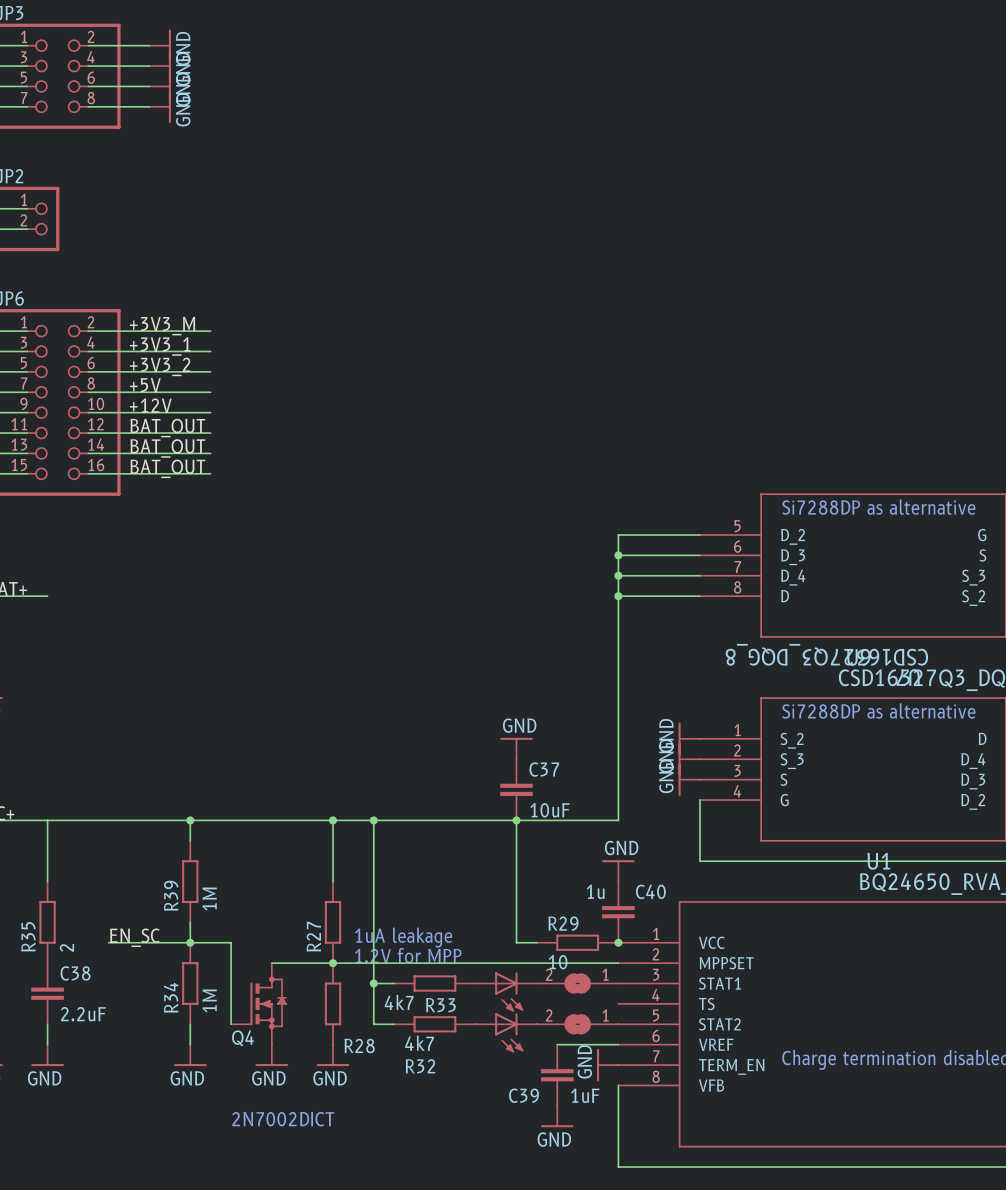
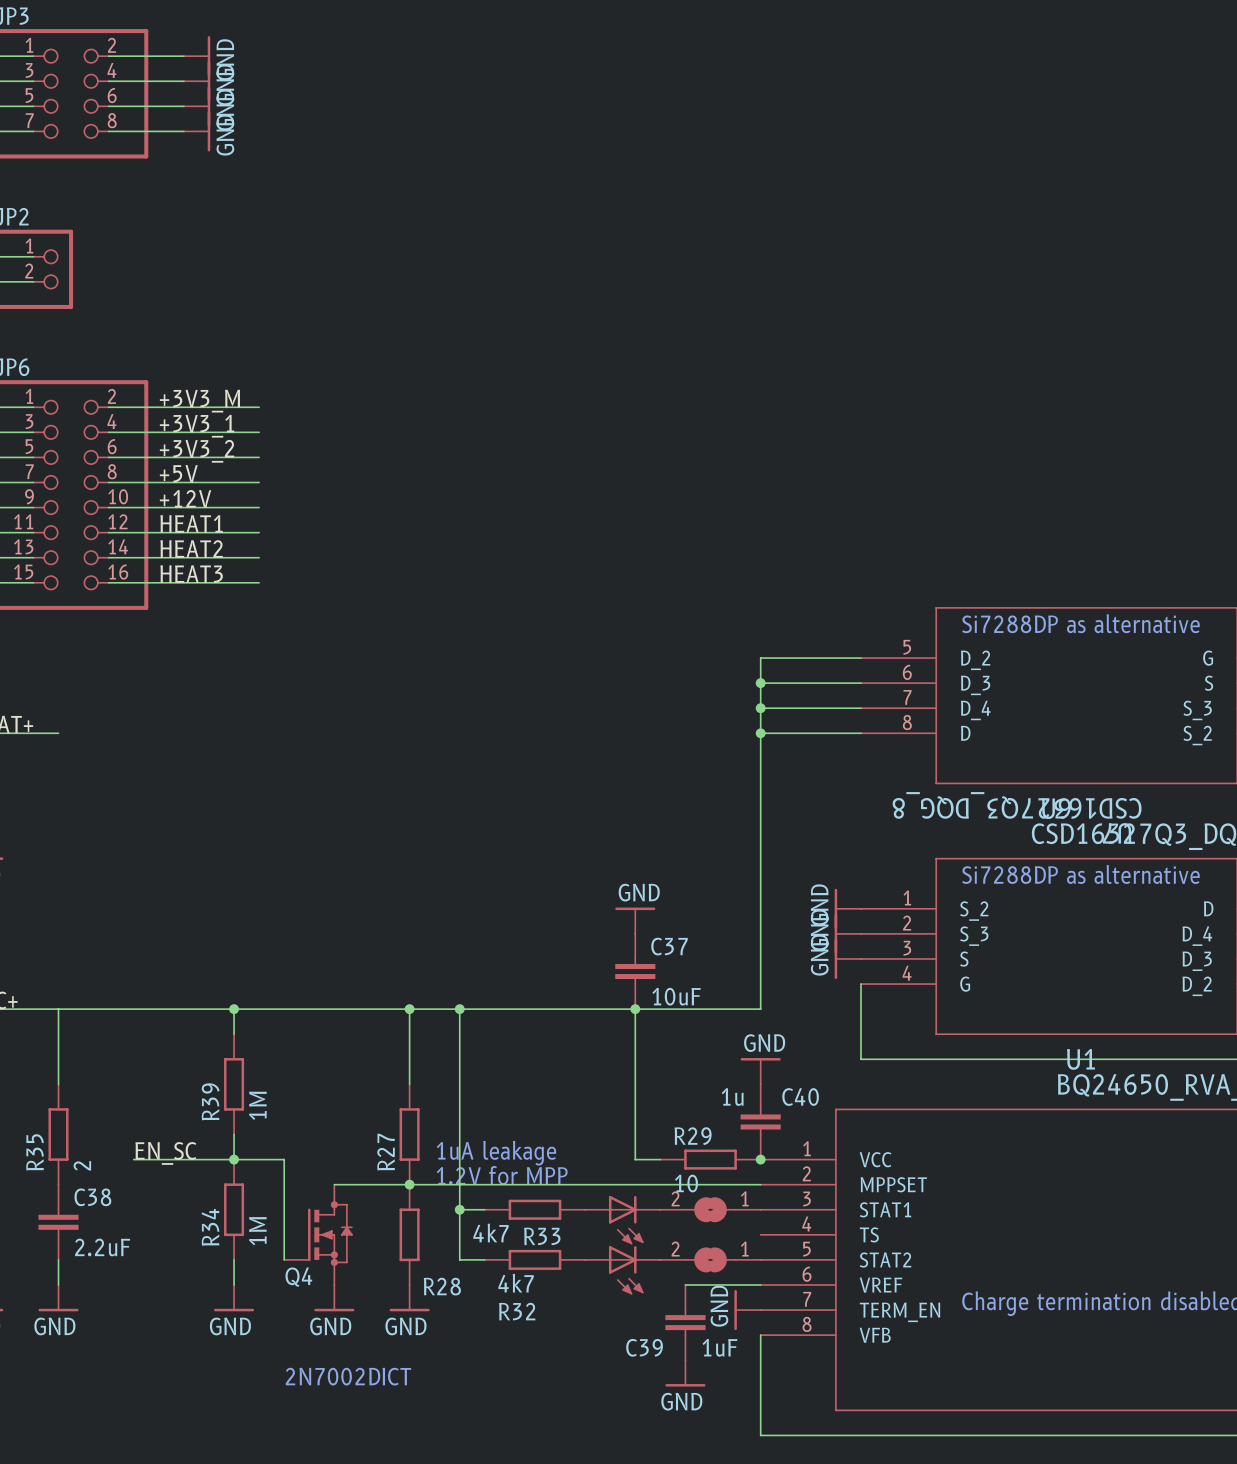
label: BAT_OUT (167, 428) -> HEAT1 (191, 523)
label: BAT_OUT (167, 448) -> HEAT2 (191, 548)
label: BAT_OUT (167, 468) -> HEAT3 (191, 574)

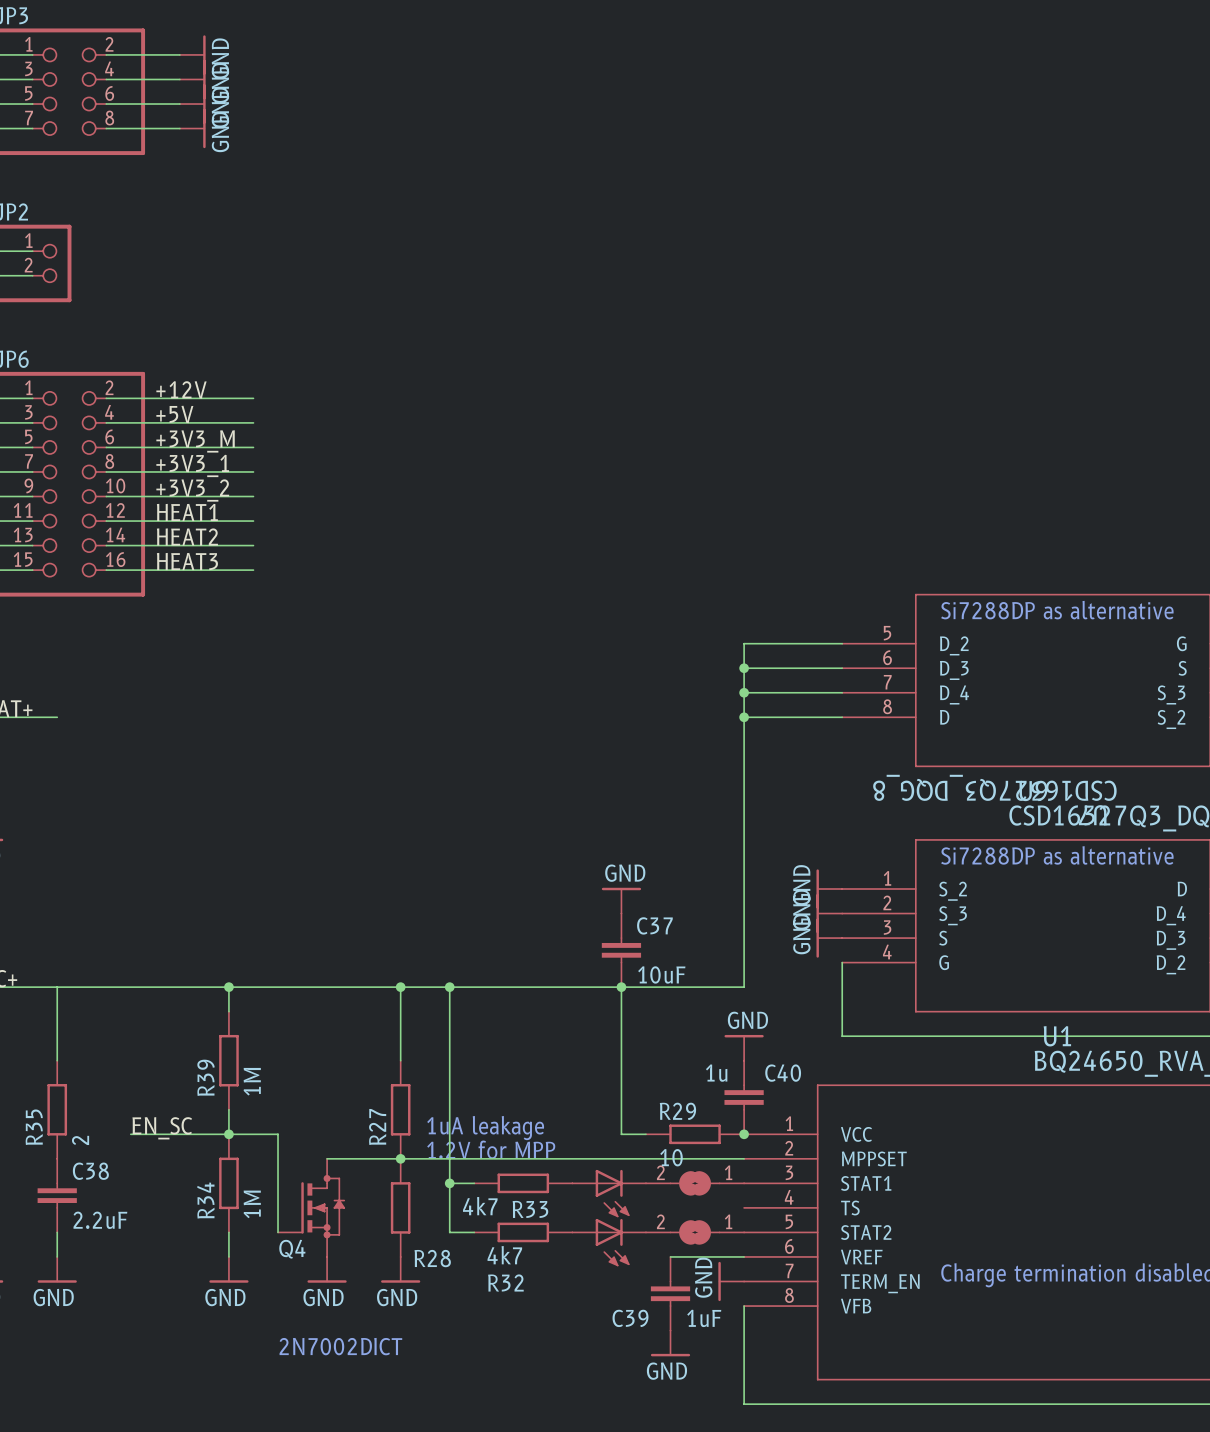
label: +3V3_M (199, 401) -> +12V (181, 389)
label: +3V3_1 (197, 426) -> +5V (174, 414)
label: +3V3_2 (197, 451) -> +3V3_M (195, 441)
label: +5V (178, 473) -> +3V3_1 (192, 465)
label: +12V (185, 498) -> +3V3_2 (192, 490)

